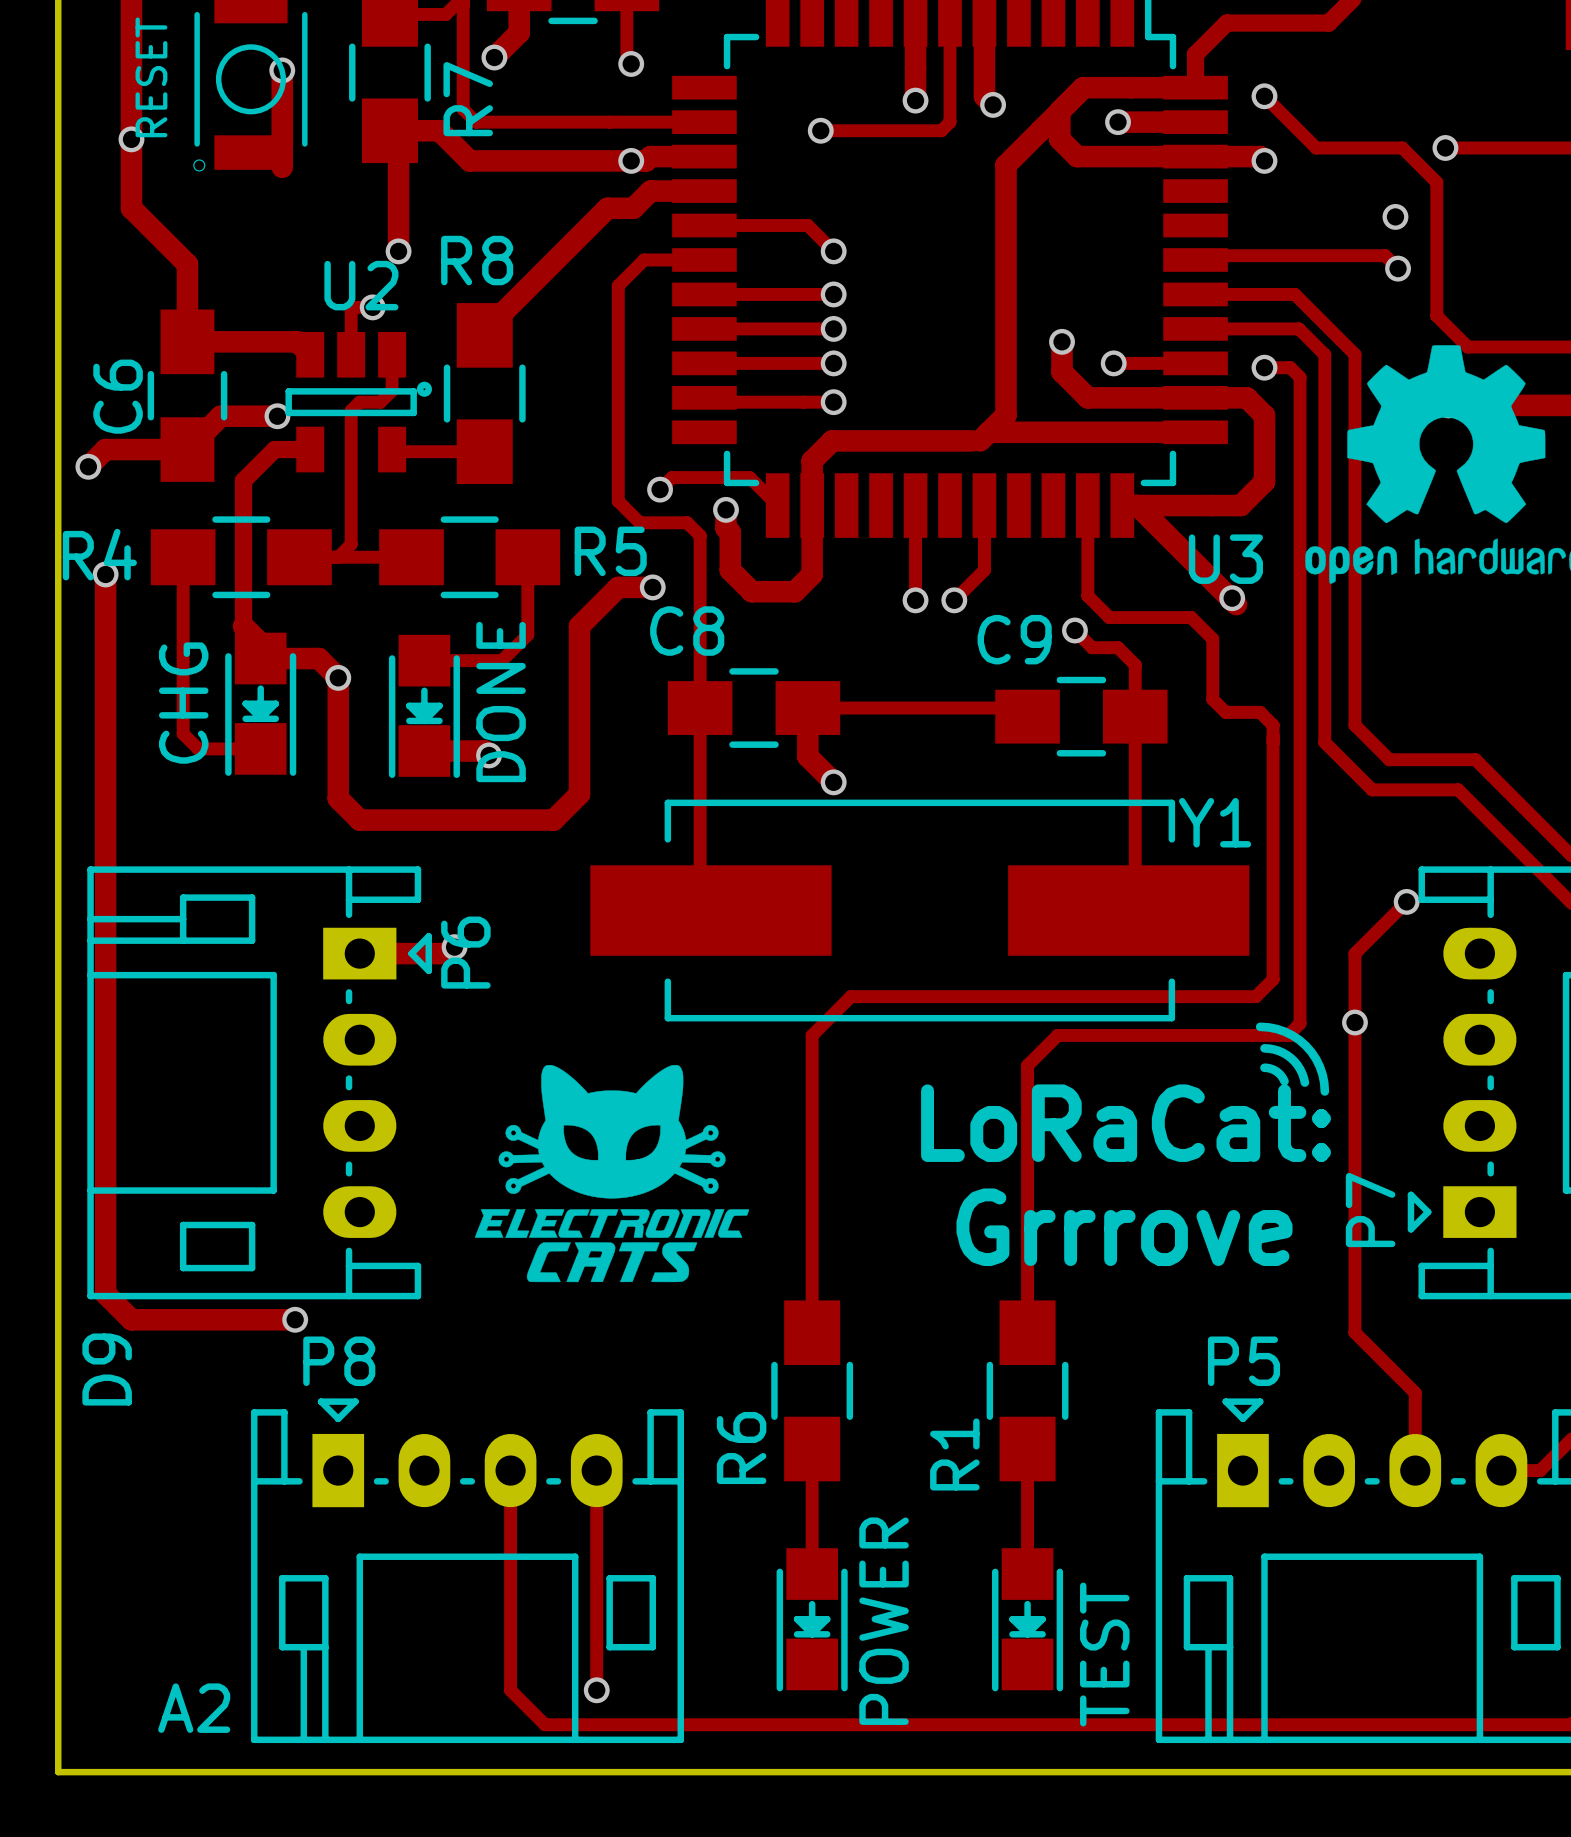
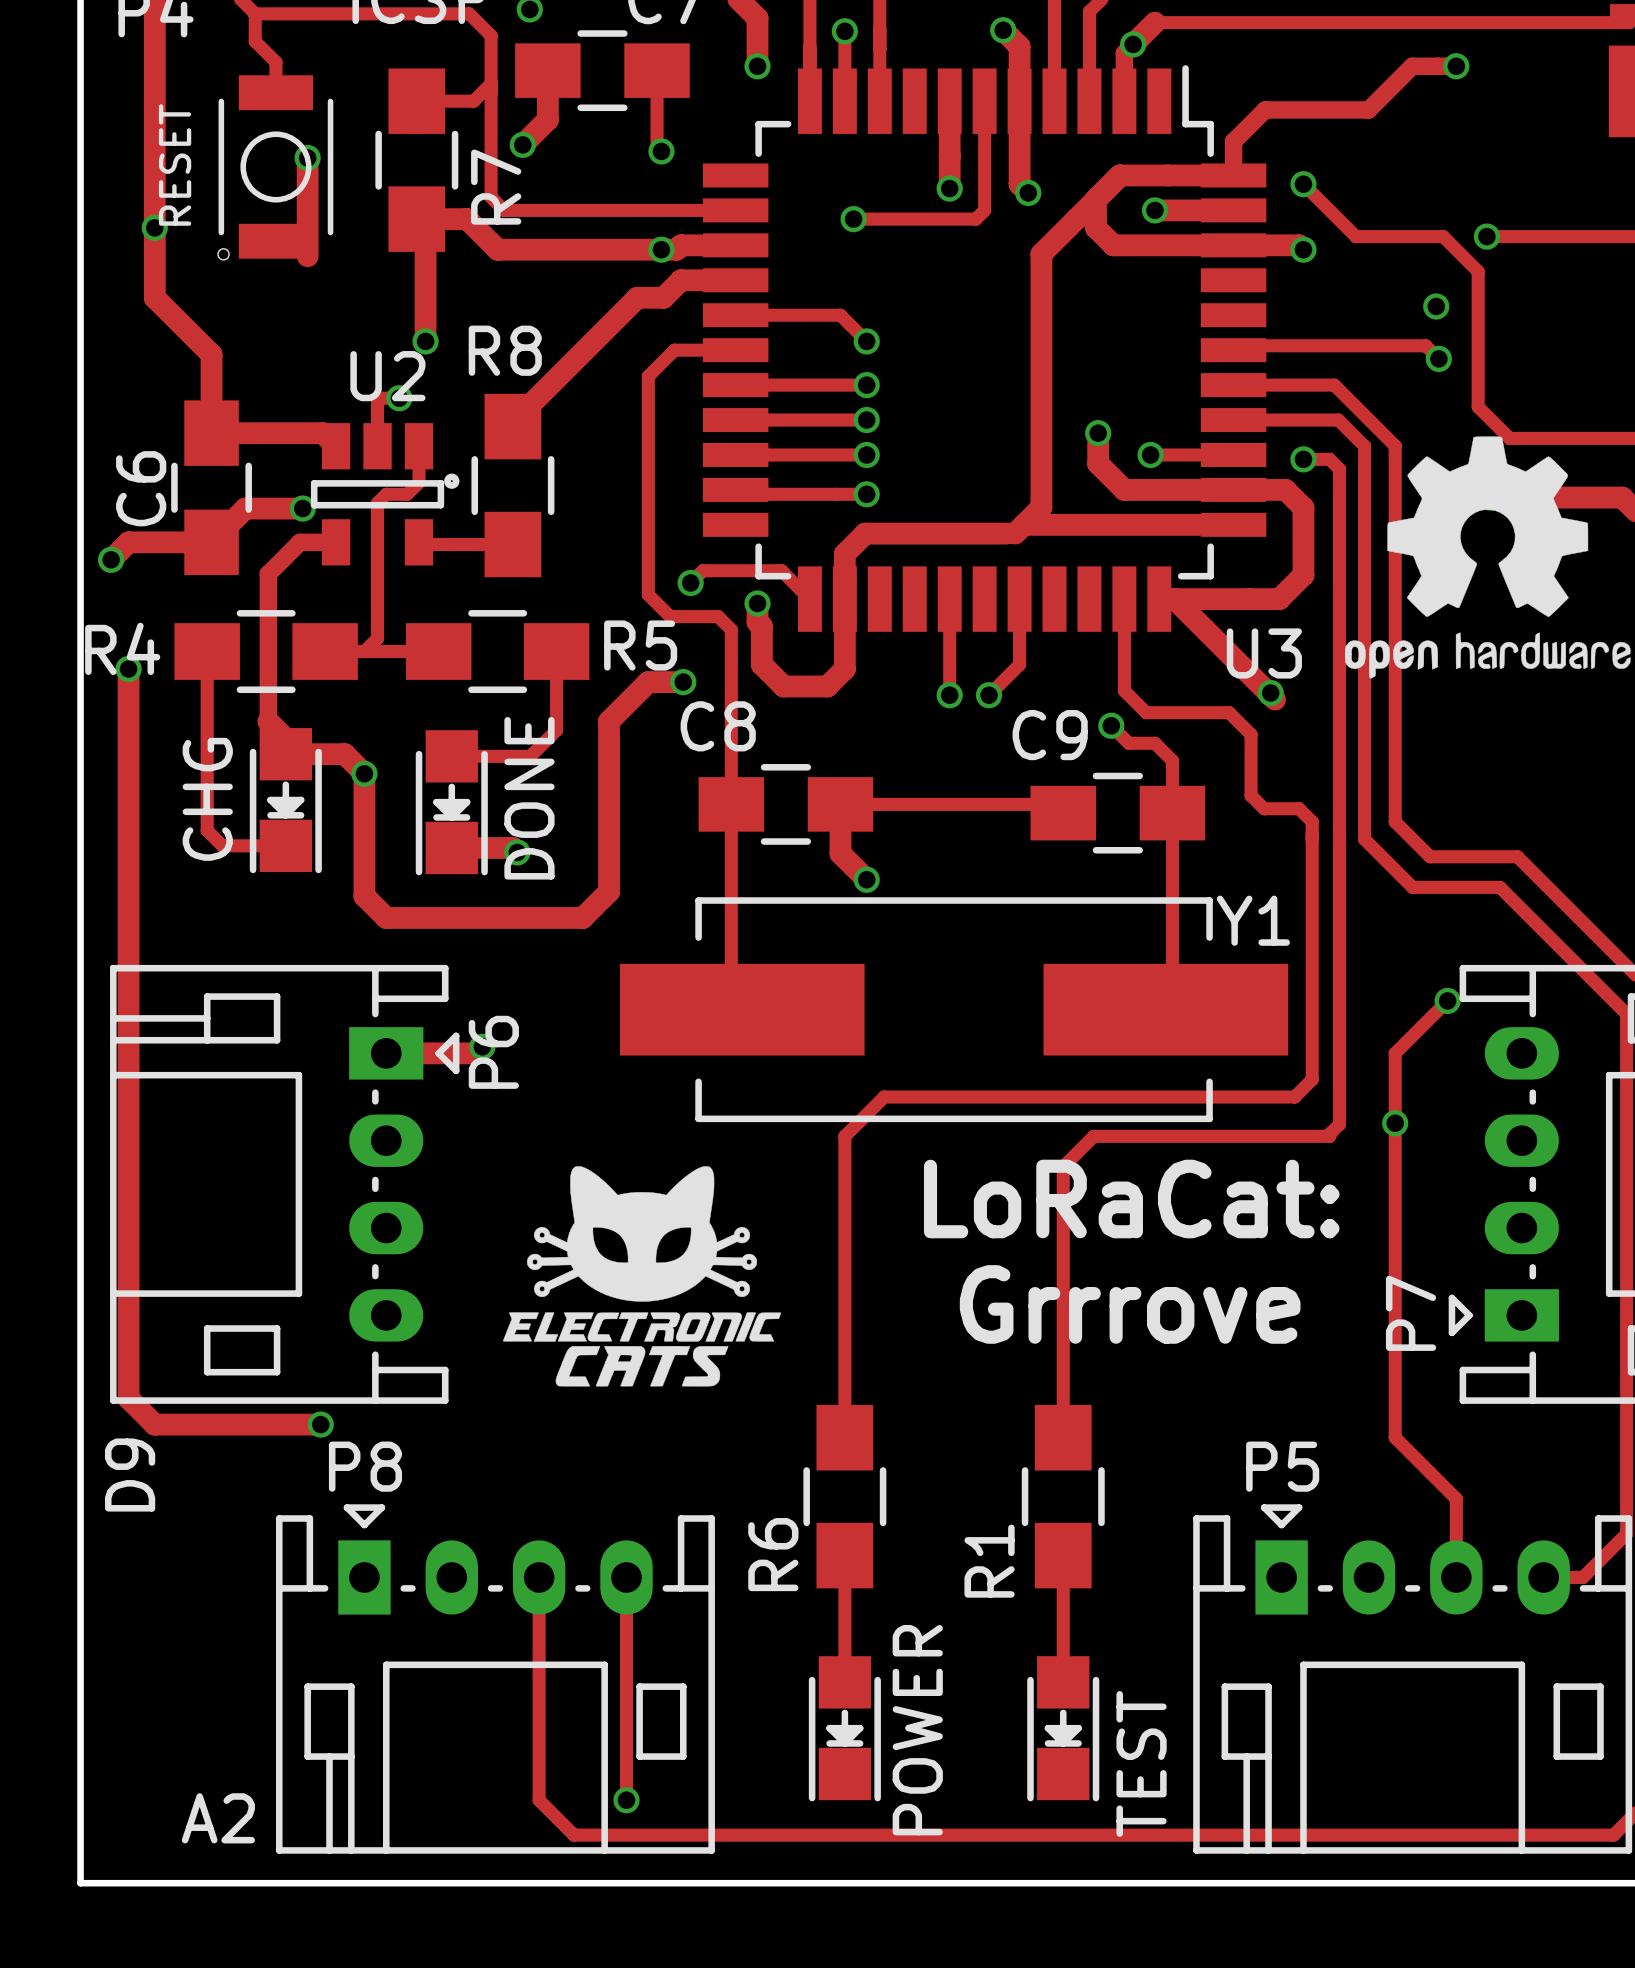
line: (1260, 1026) (1284, 1031) (1305, 1045) (1319, 1066) (1324, 1091) -> none
line: (1264, 1048) (1278, 1050) (1290, 1058) (1300, 1069) (1304, 1082) -> none
line: (1264, 1067) (1276, 1071) (1284, 1081) -> none
text position: LoRaCat: (1126, 1123) -> LoRaCat: (1131, 1198)
text position: Grrrove (1124, 1227) -> Grrrove (1130, 1304)

